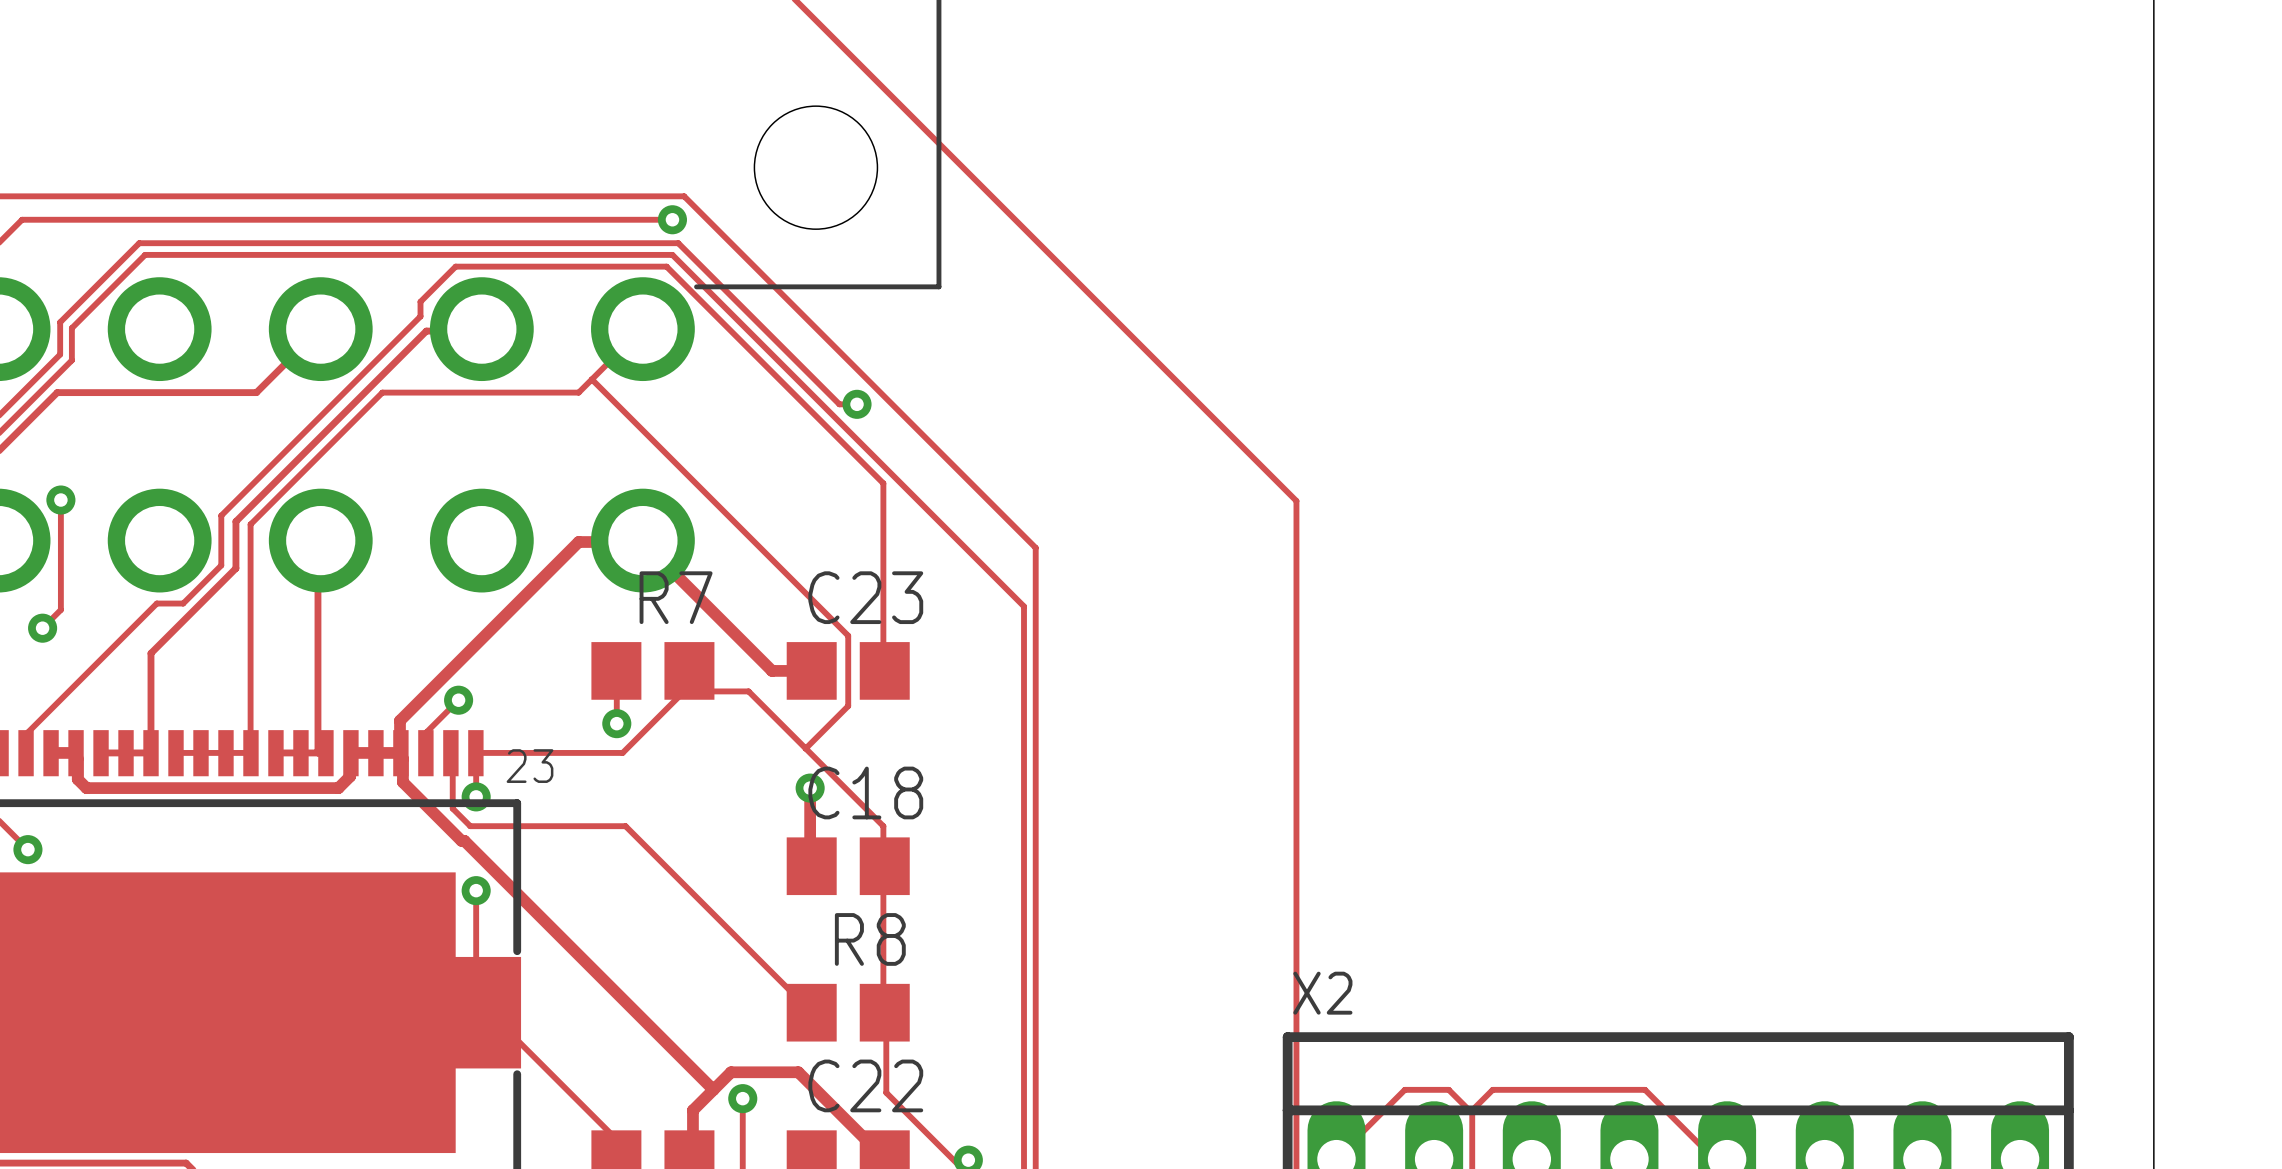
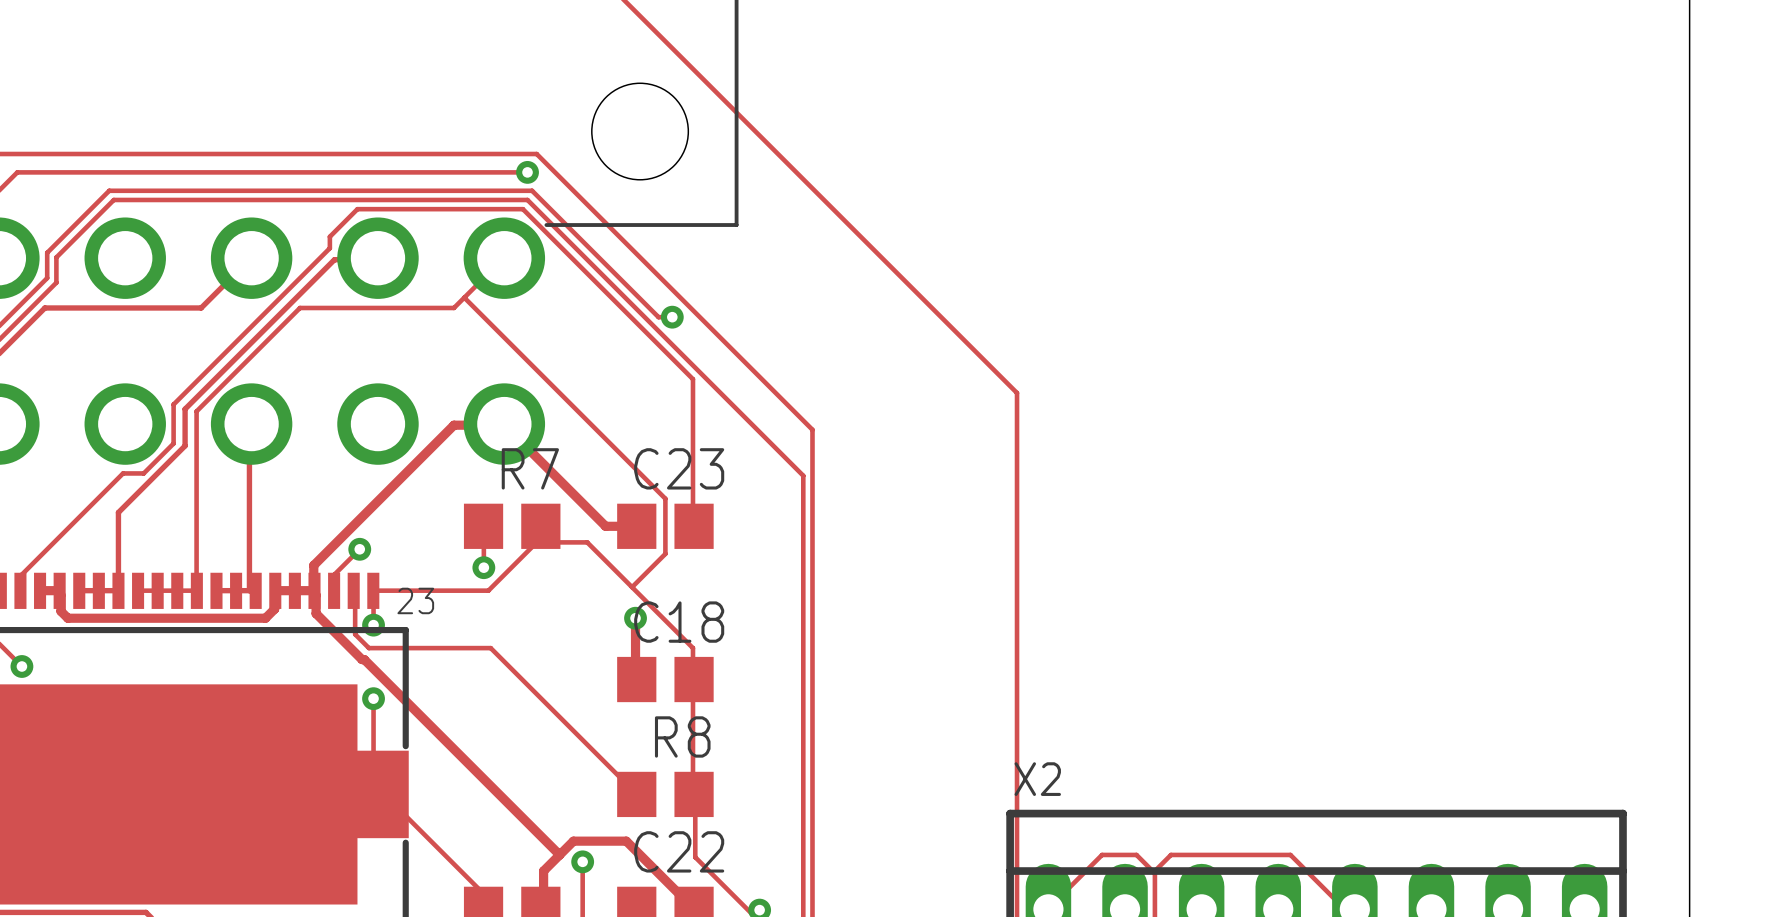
track: (60, 500) (60, 609) (42, 628) -> none
via: (60, 500) -> none
via: (42, 628) -> none

